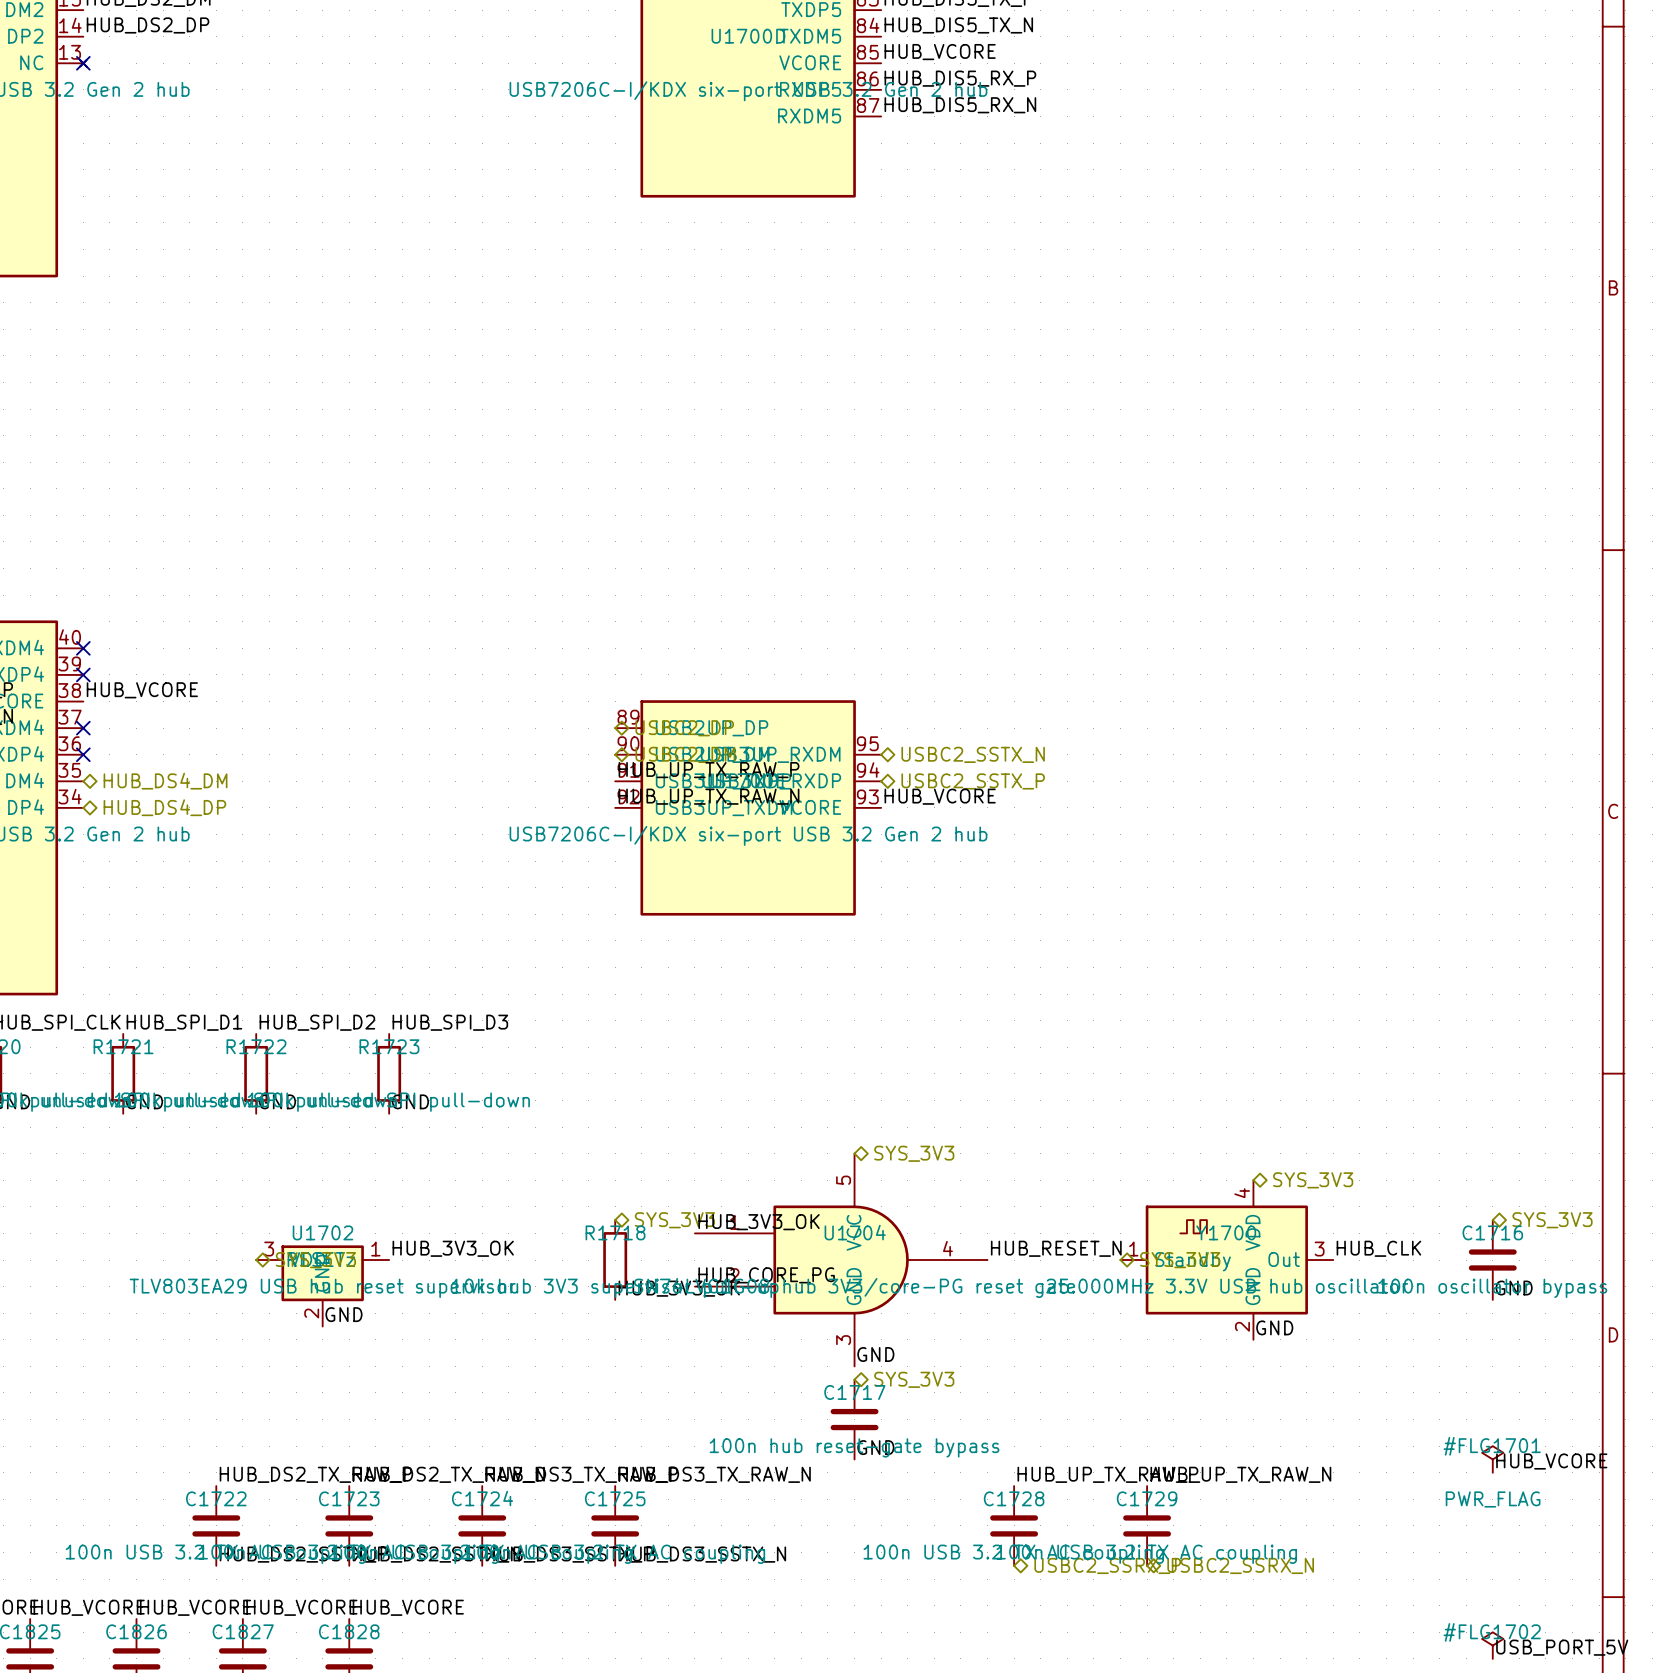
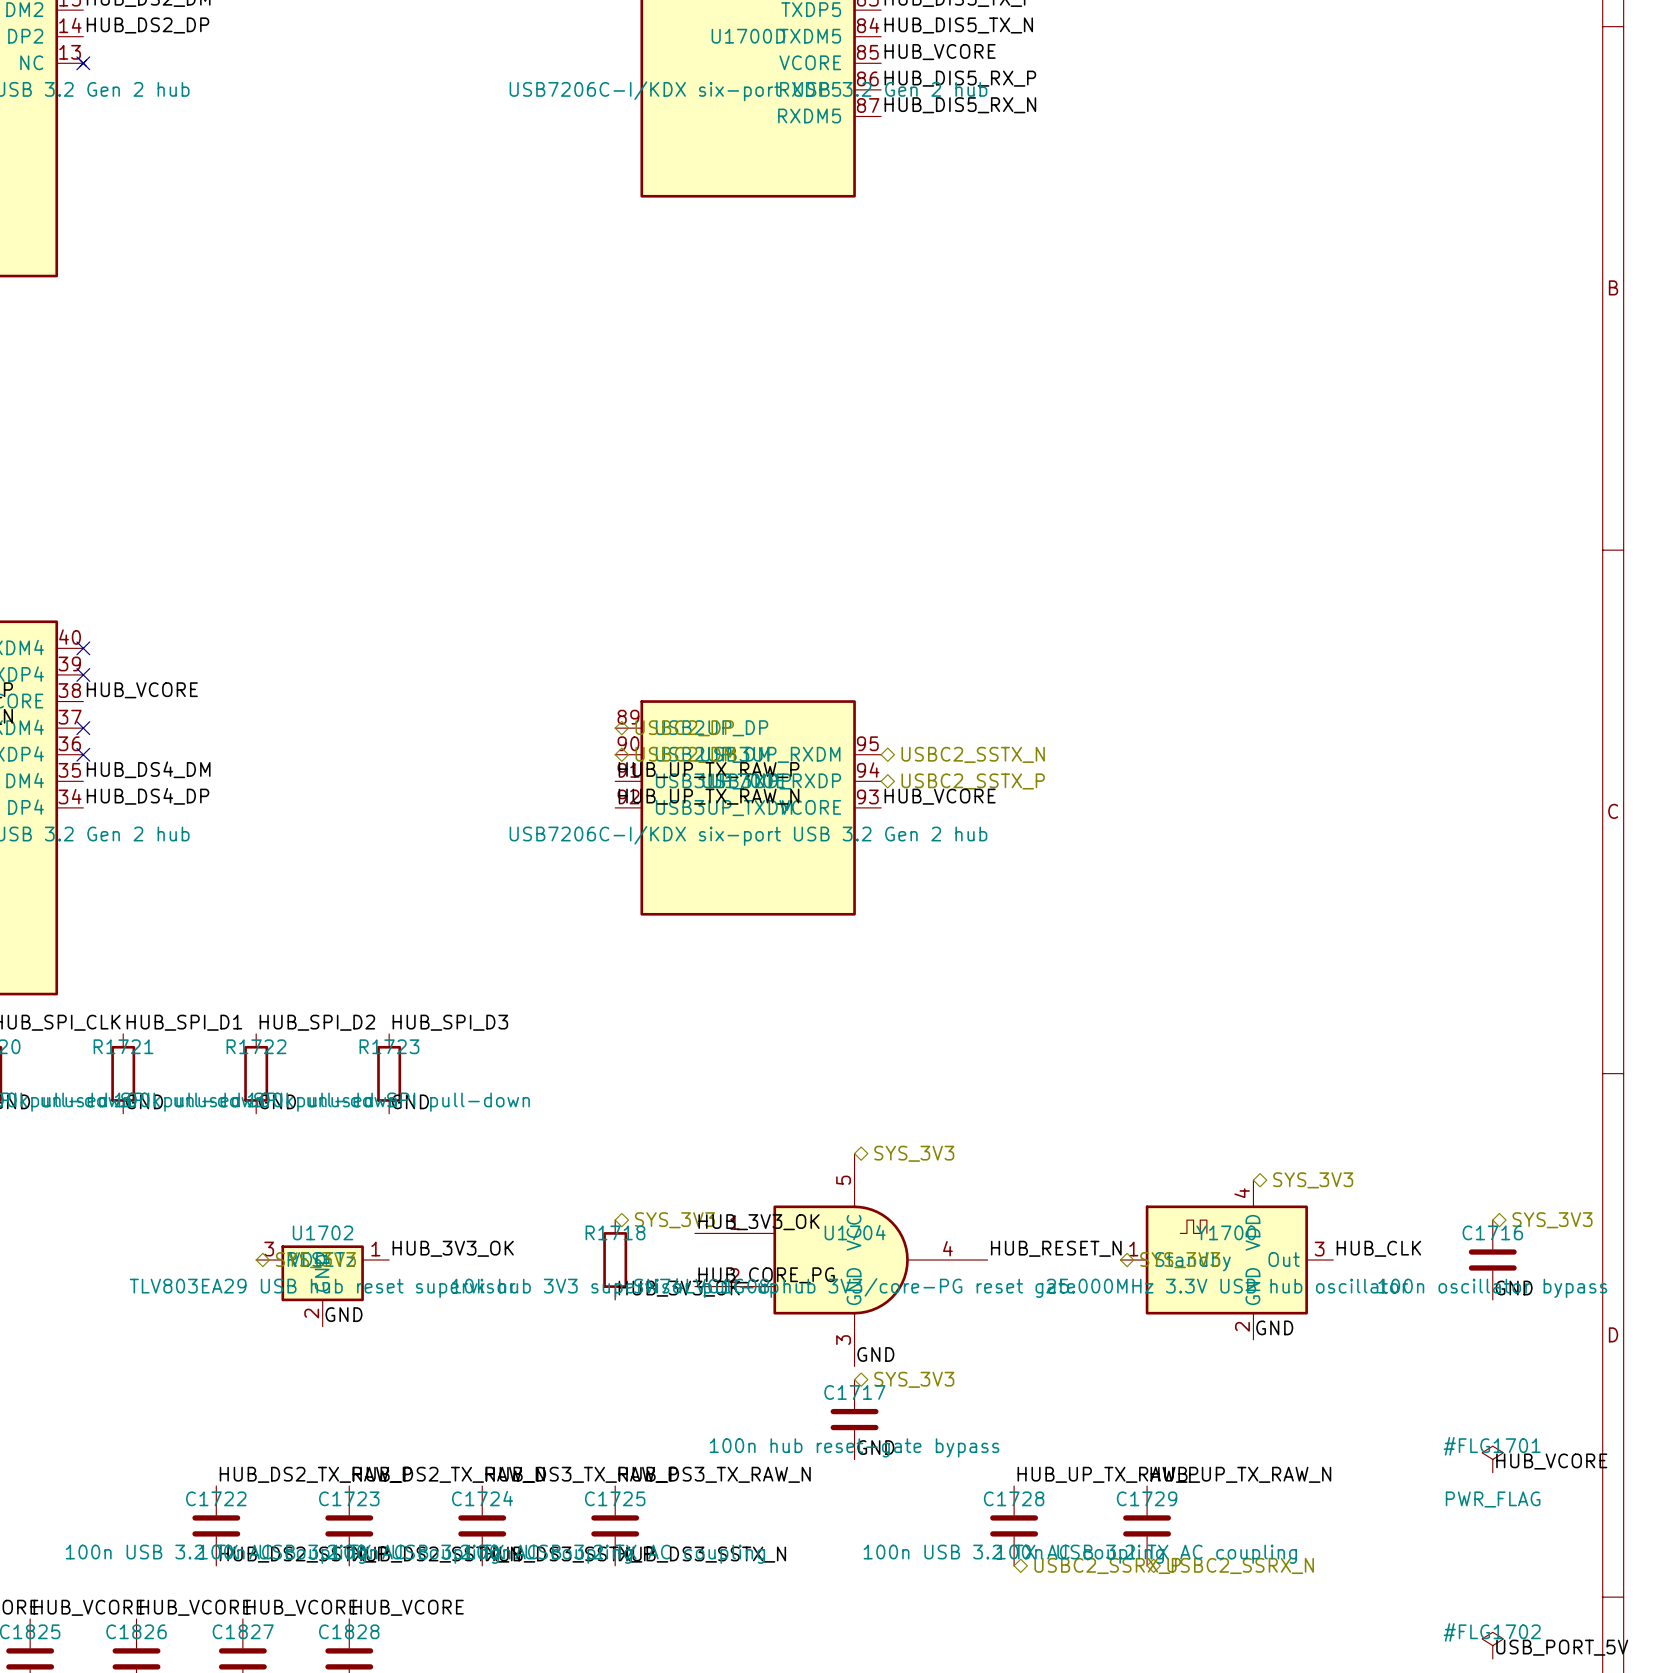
label: none -> HUB_DS4_DM (148, 769)
hierarchical label: HUB_DS4_DM (165, 781) -> none
label: none -> HUB_DS4_DP (148, 796)
hierarchical label: HUB_DS4_DP (164, 807) -> none

